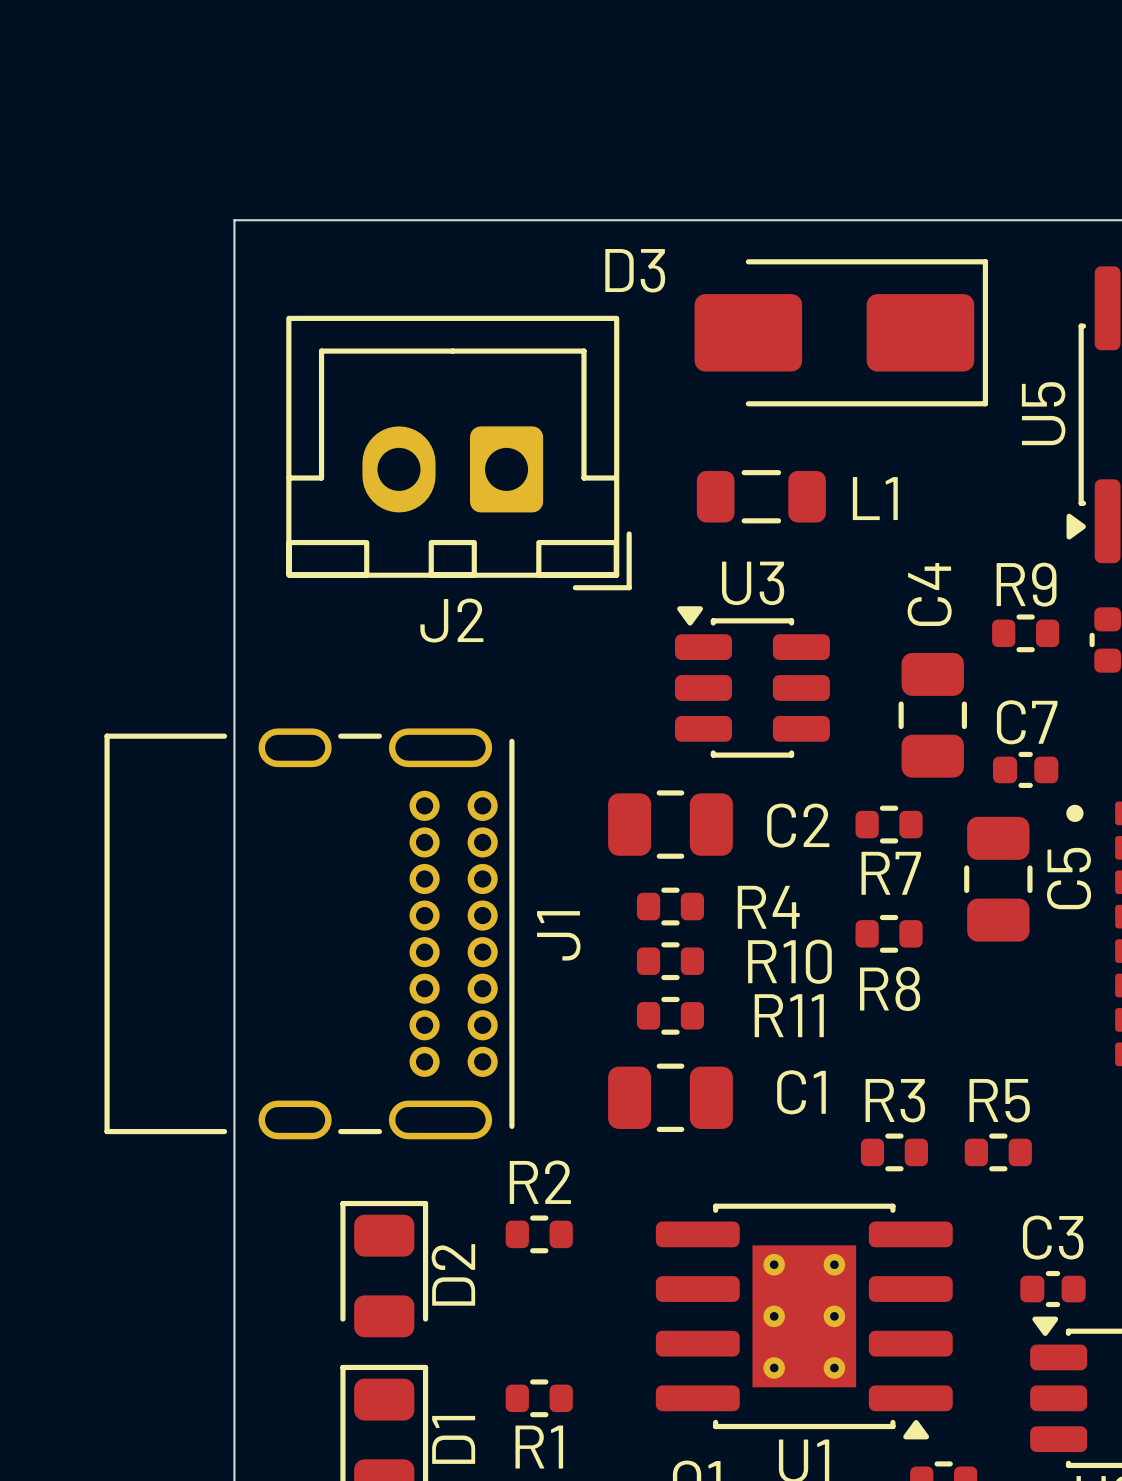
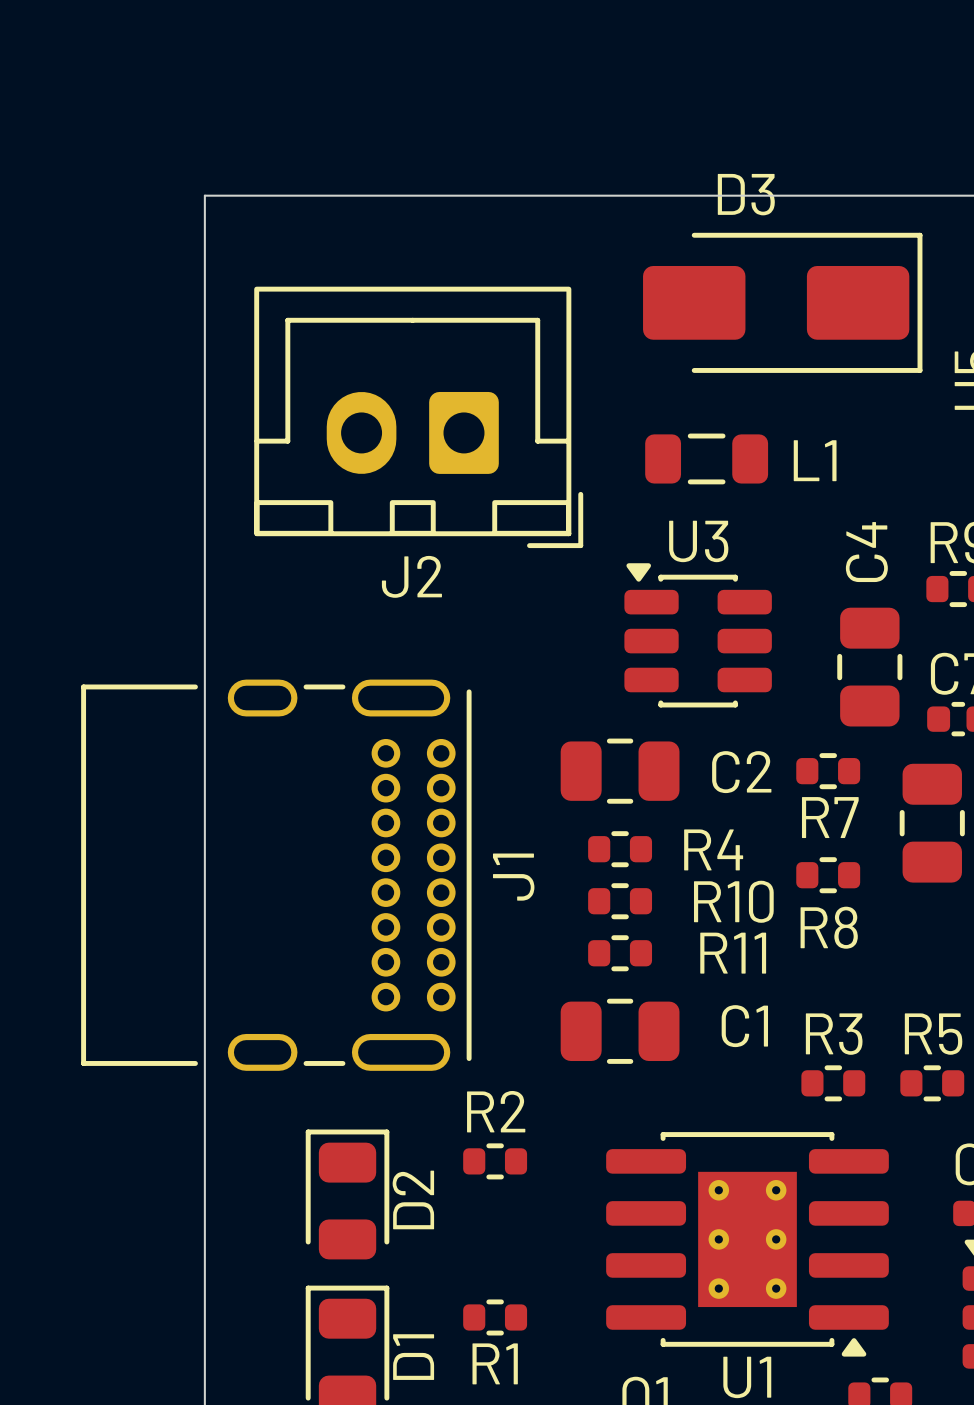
D3 name position: D3 (635, 270) -> D3 (746, 194)

